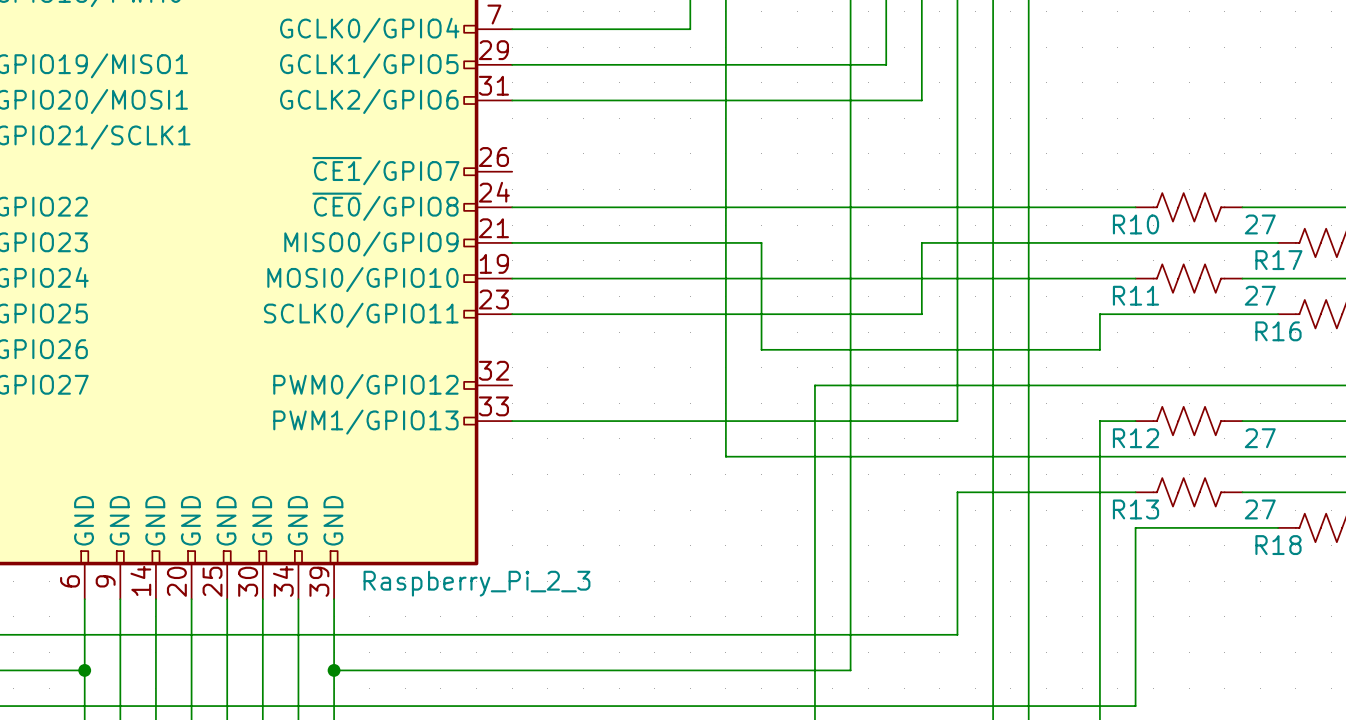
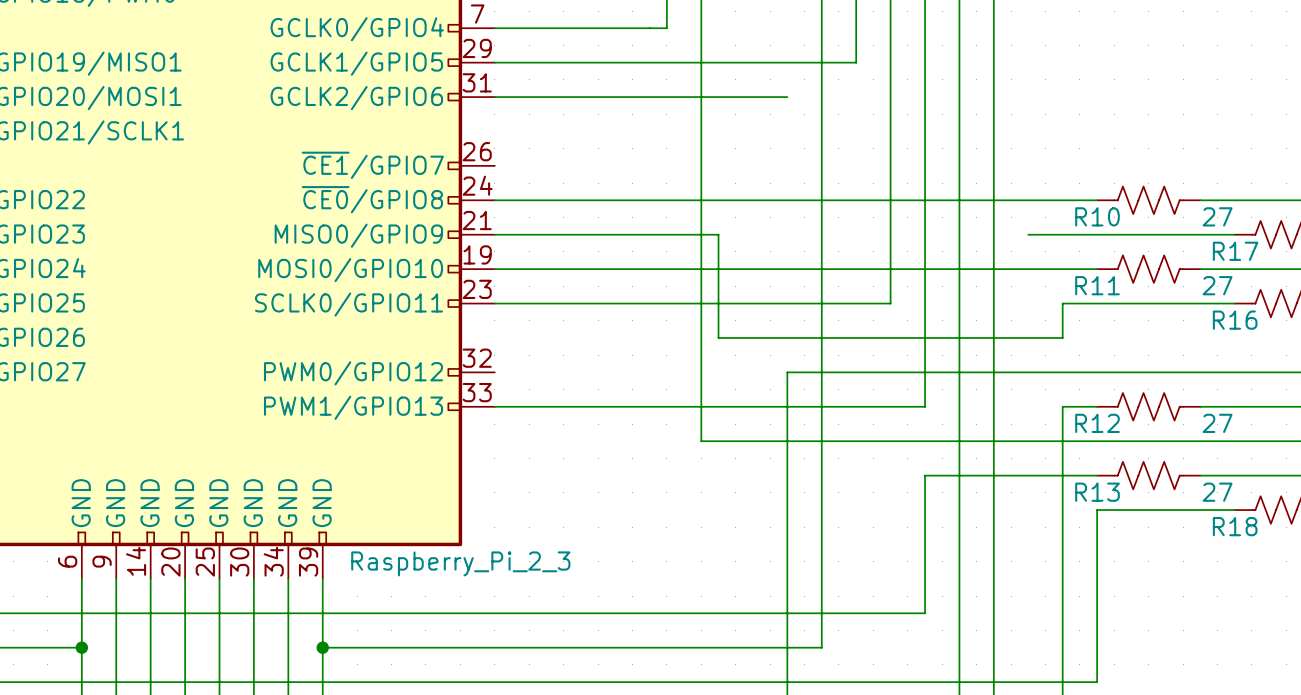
wire: (814, 100) (921, 100) -> (890, 234) (890, 97)
wire: (743, 242) (761, 242) (761, 349) -> (718, 234) (718, 337) (735, 337)
wire: (921, 242) (1064, 242) -> none

